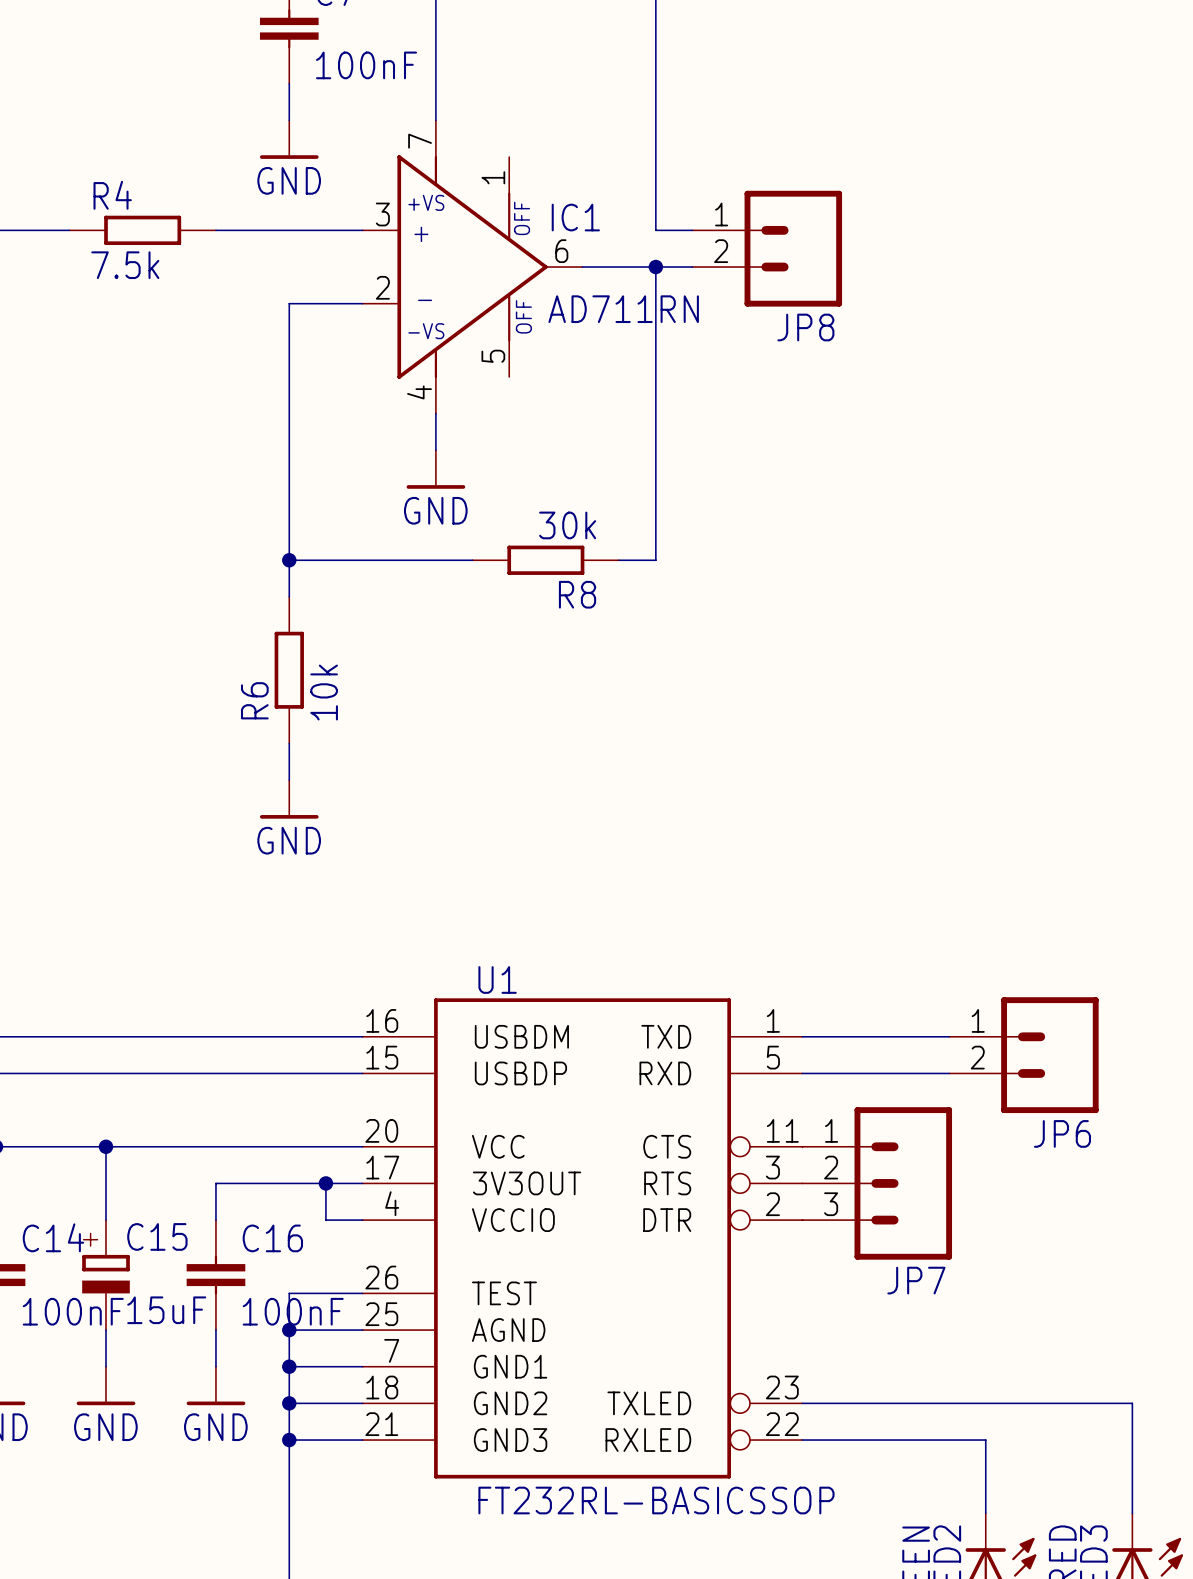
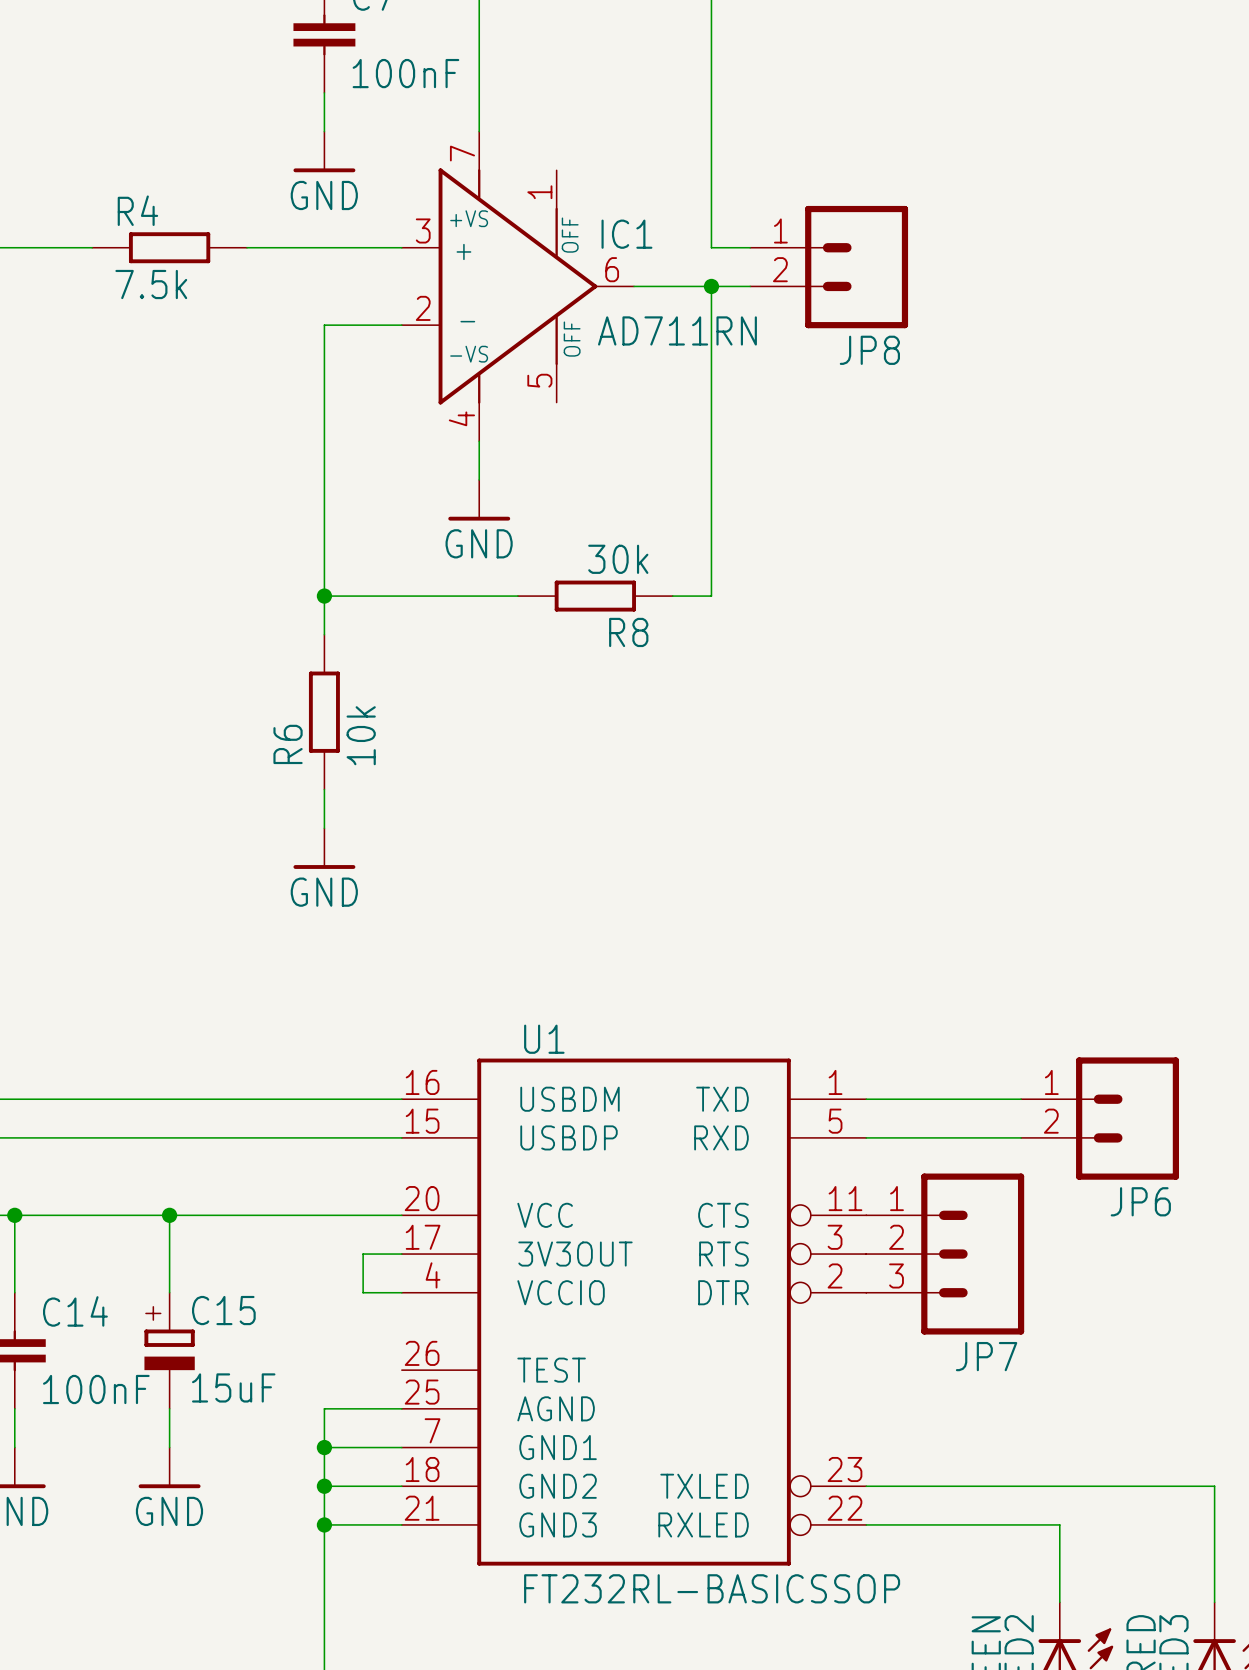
wire: (106, 1146) (106, 1220) -> (169, 1215) (169, 1292)
junction position: (106, 1146) -> (169, 1215)
wire: (325, 1183) (215, 1183) (215, 1220) -> none
junction: (325, 1183) -> none
C15 position: (106, 1275) -> (169, 1350)
C16: 100nF (215, 1275) -> none
wire: (362, 1293) (289, 1293) (289, 1330) -> none
wire: (106, 1330) (106, 1366) -> (169, 1408) (169, 1447)
wire: (215, 1330) (215, 1366) -> none
junction: (289, 1330) -> none
power symbol: GND (106, 1385) -> none
power symbol: none -> GND (169, 1467)
power symbol: GND (215, 1385) -> none

